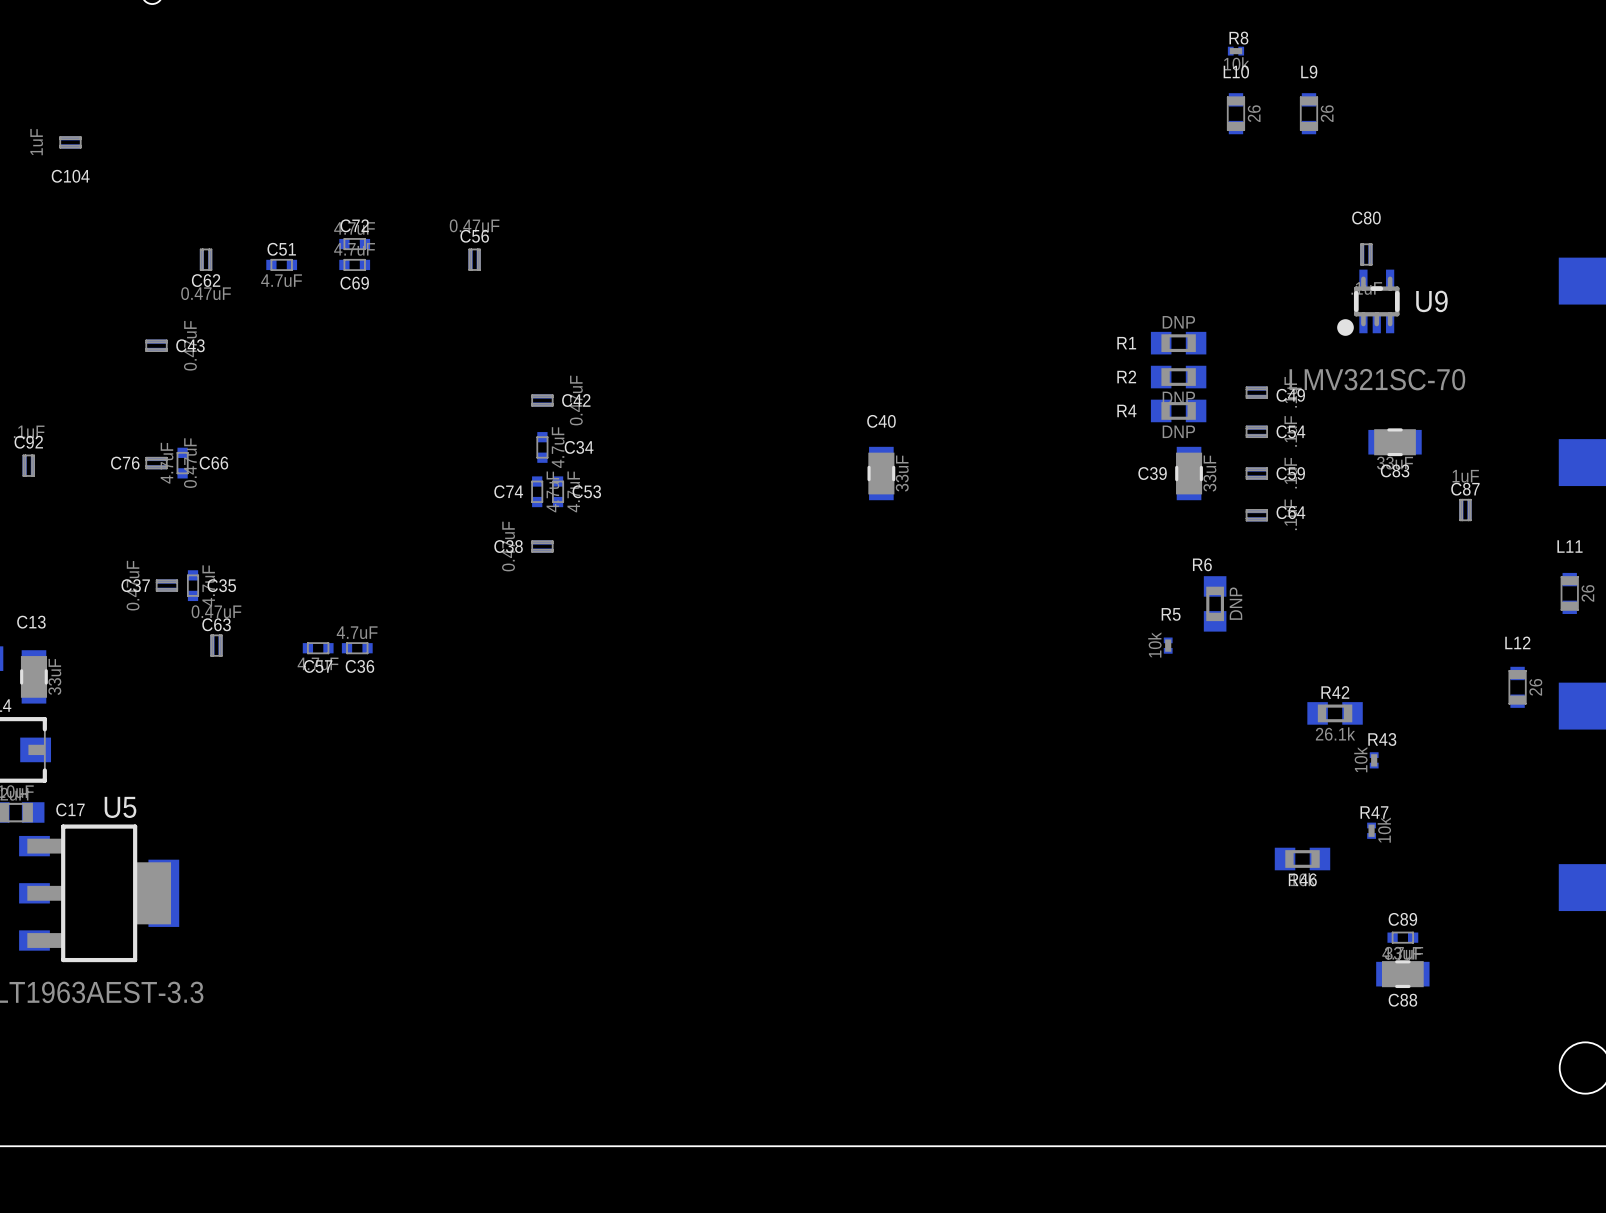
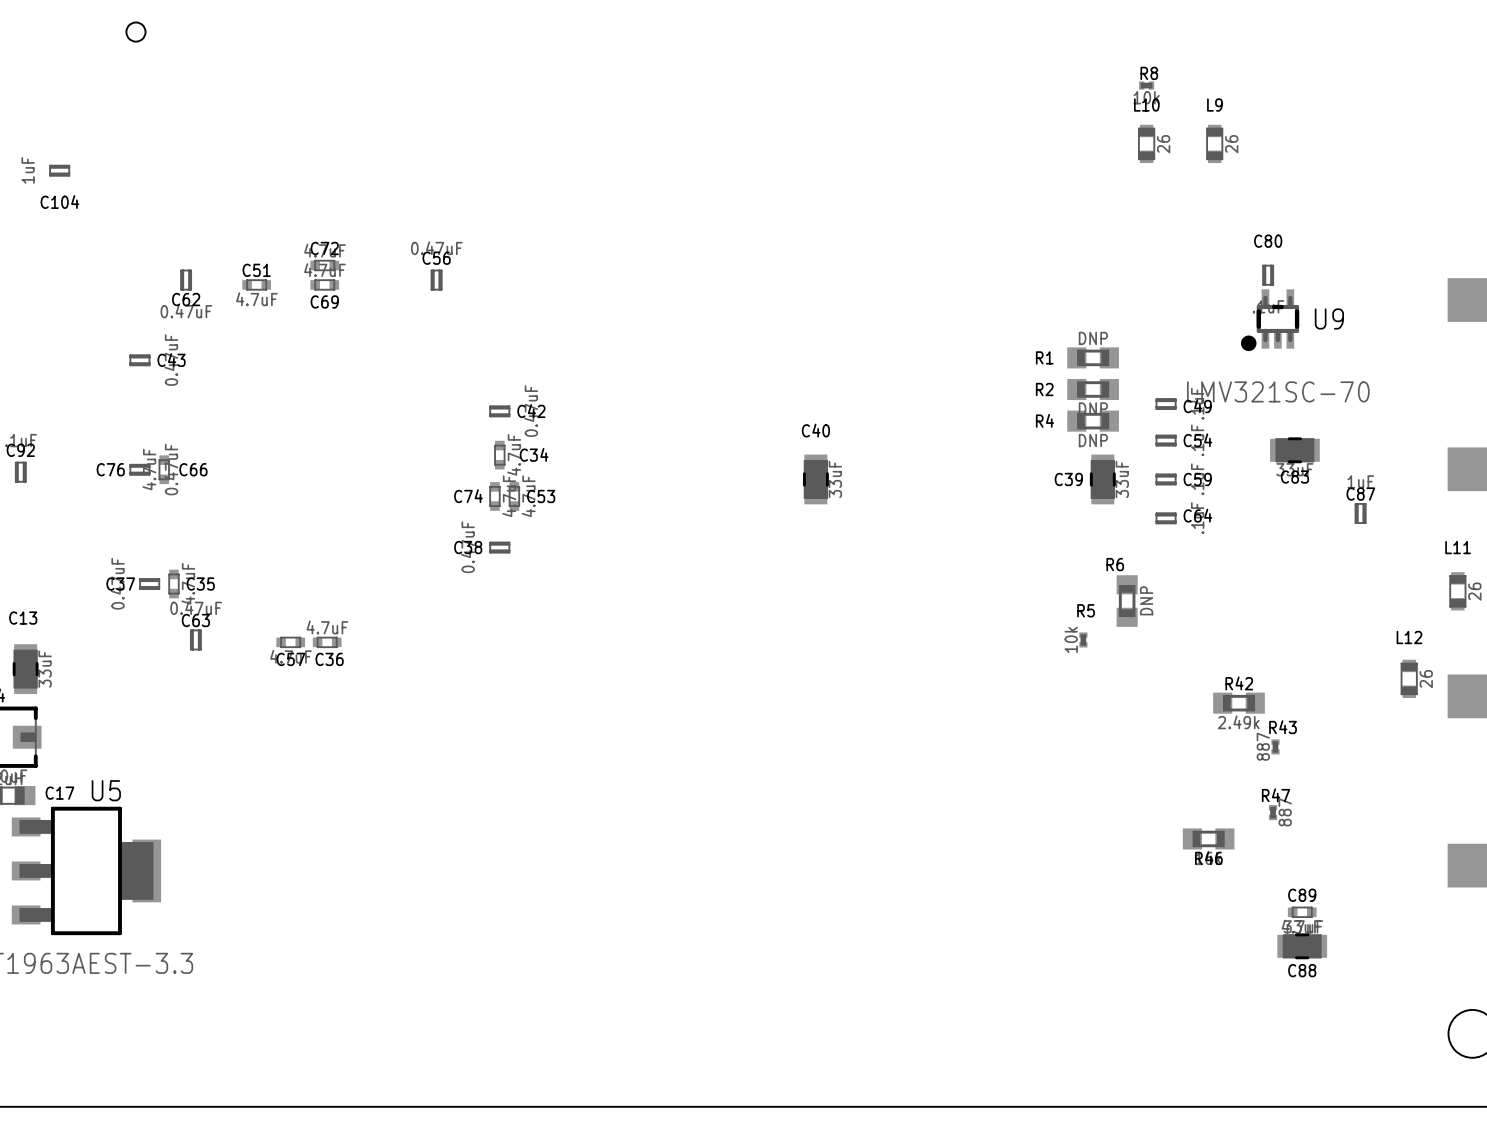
R42 value: 26.1k (1335, 734) -> 2.49k (1238, 722)
R43 value: 10k (1360, 759) -> 887 (1263, 746)
R47 value: 10k (1384, 830) -> 887 (1285, 812)

